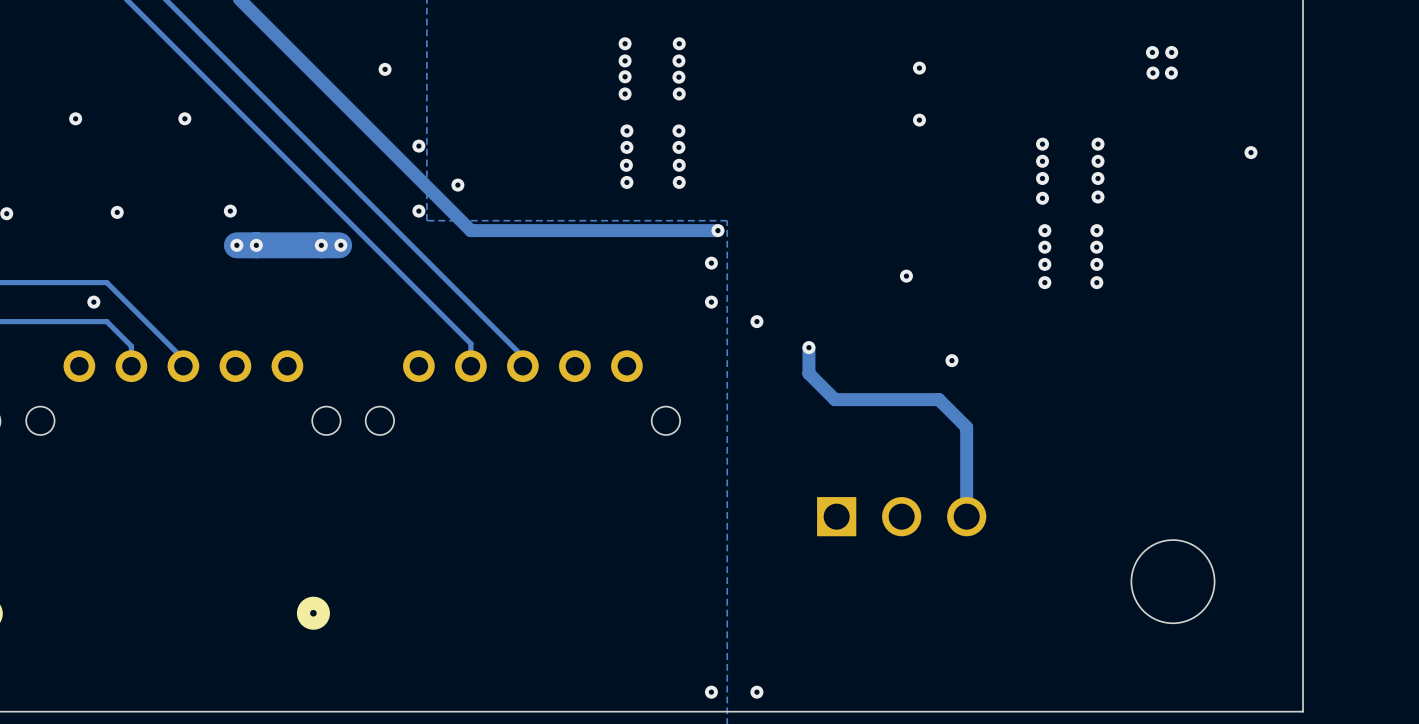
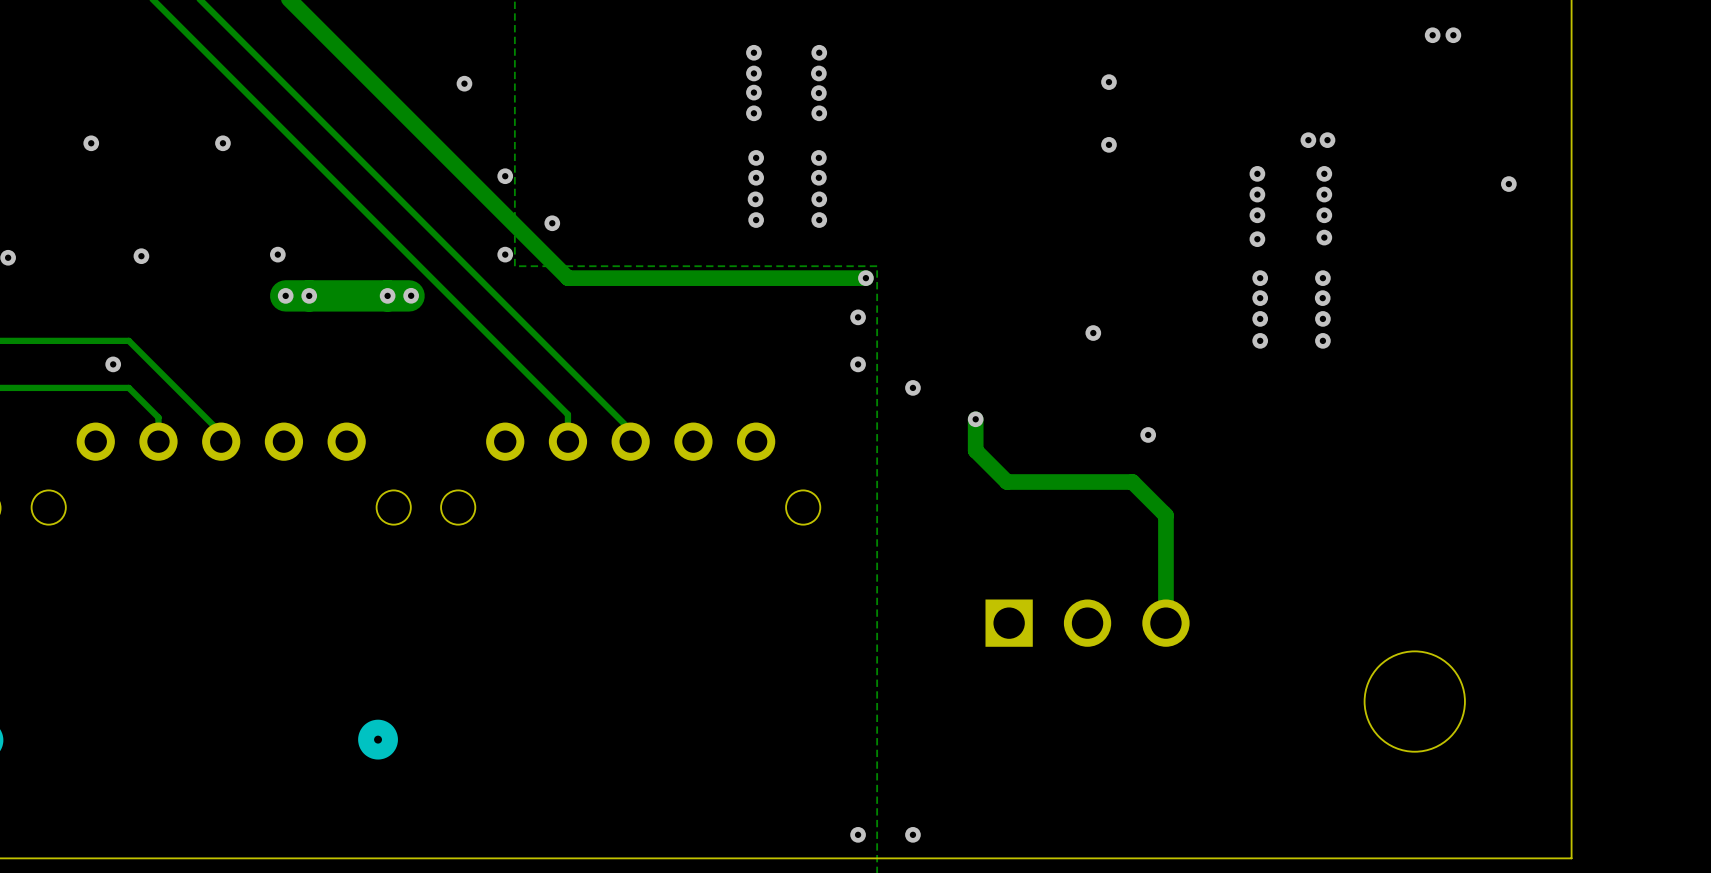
via: none -> (1432, 35)
via: none -> (1453, 35)
via: (1152, 52) -> none
via: (1171, 52) -> none
via: (1152, 73) -> none
via: (1171, 73) -> none
via: none -> (1308, 140)
via: none -> (1327, 140)

